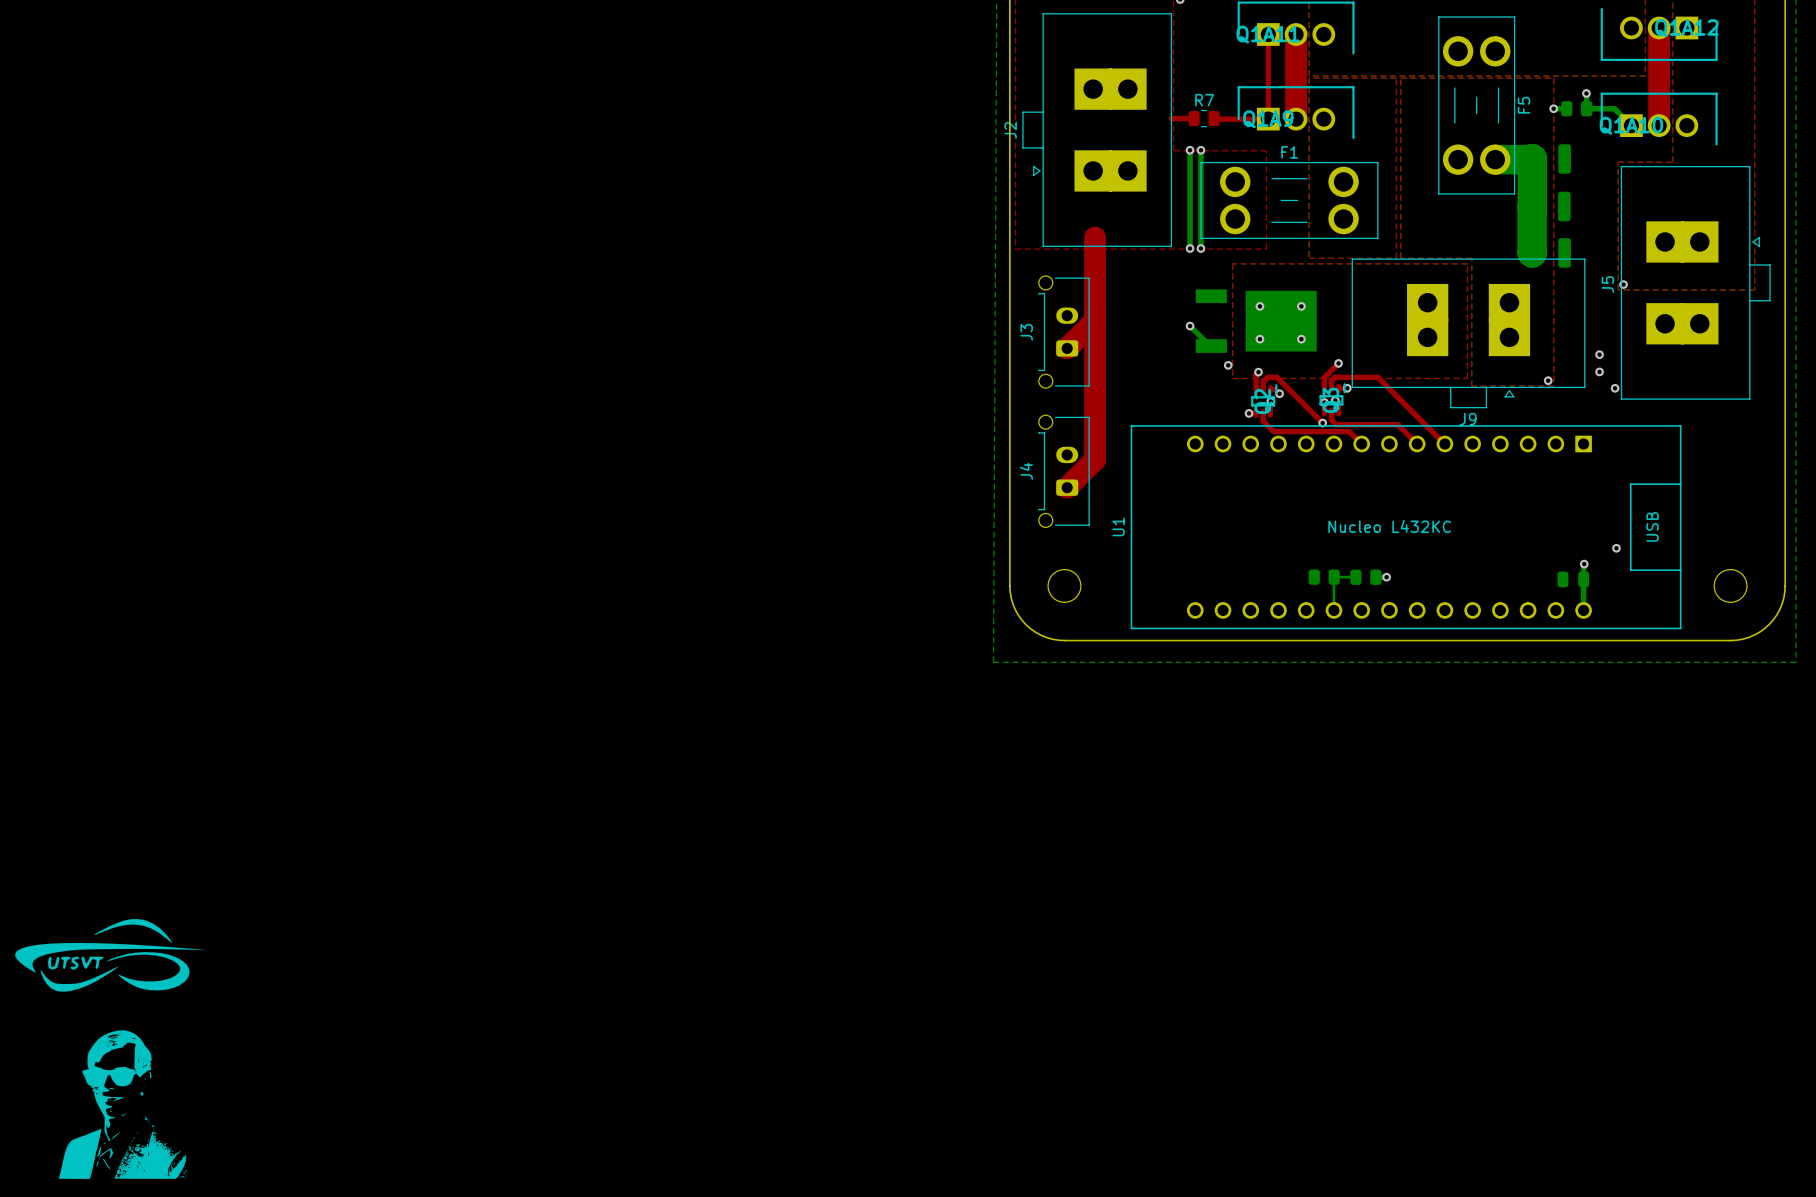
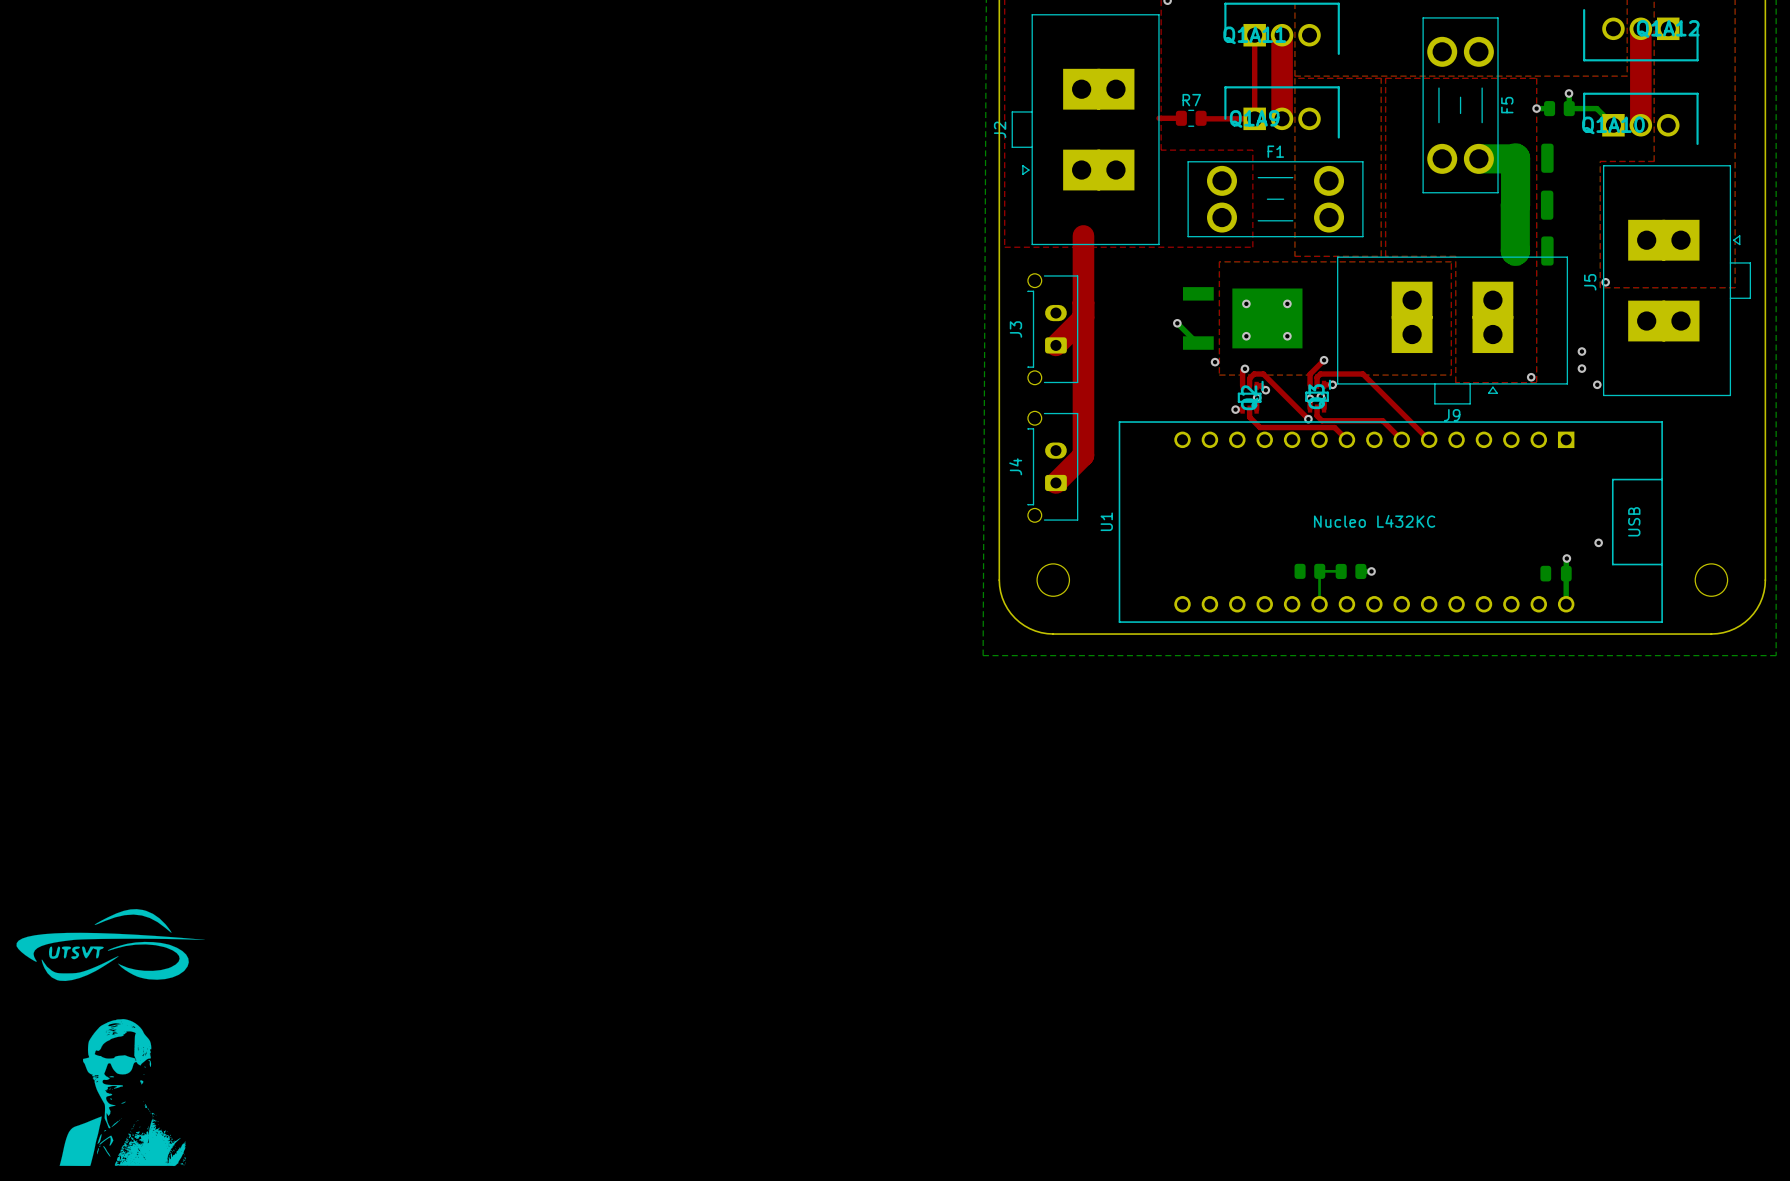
bottom track: (1190, 150) (1190, 248) -> none
via: (1190, 150) -> none
bottom track: (1200, 150) (1200, 248) -> none
via: (1200, 150) -> none
via: (1190, 248) -> none
via: (1200, 248) -> none

